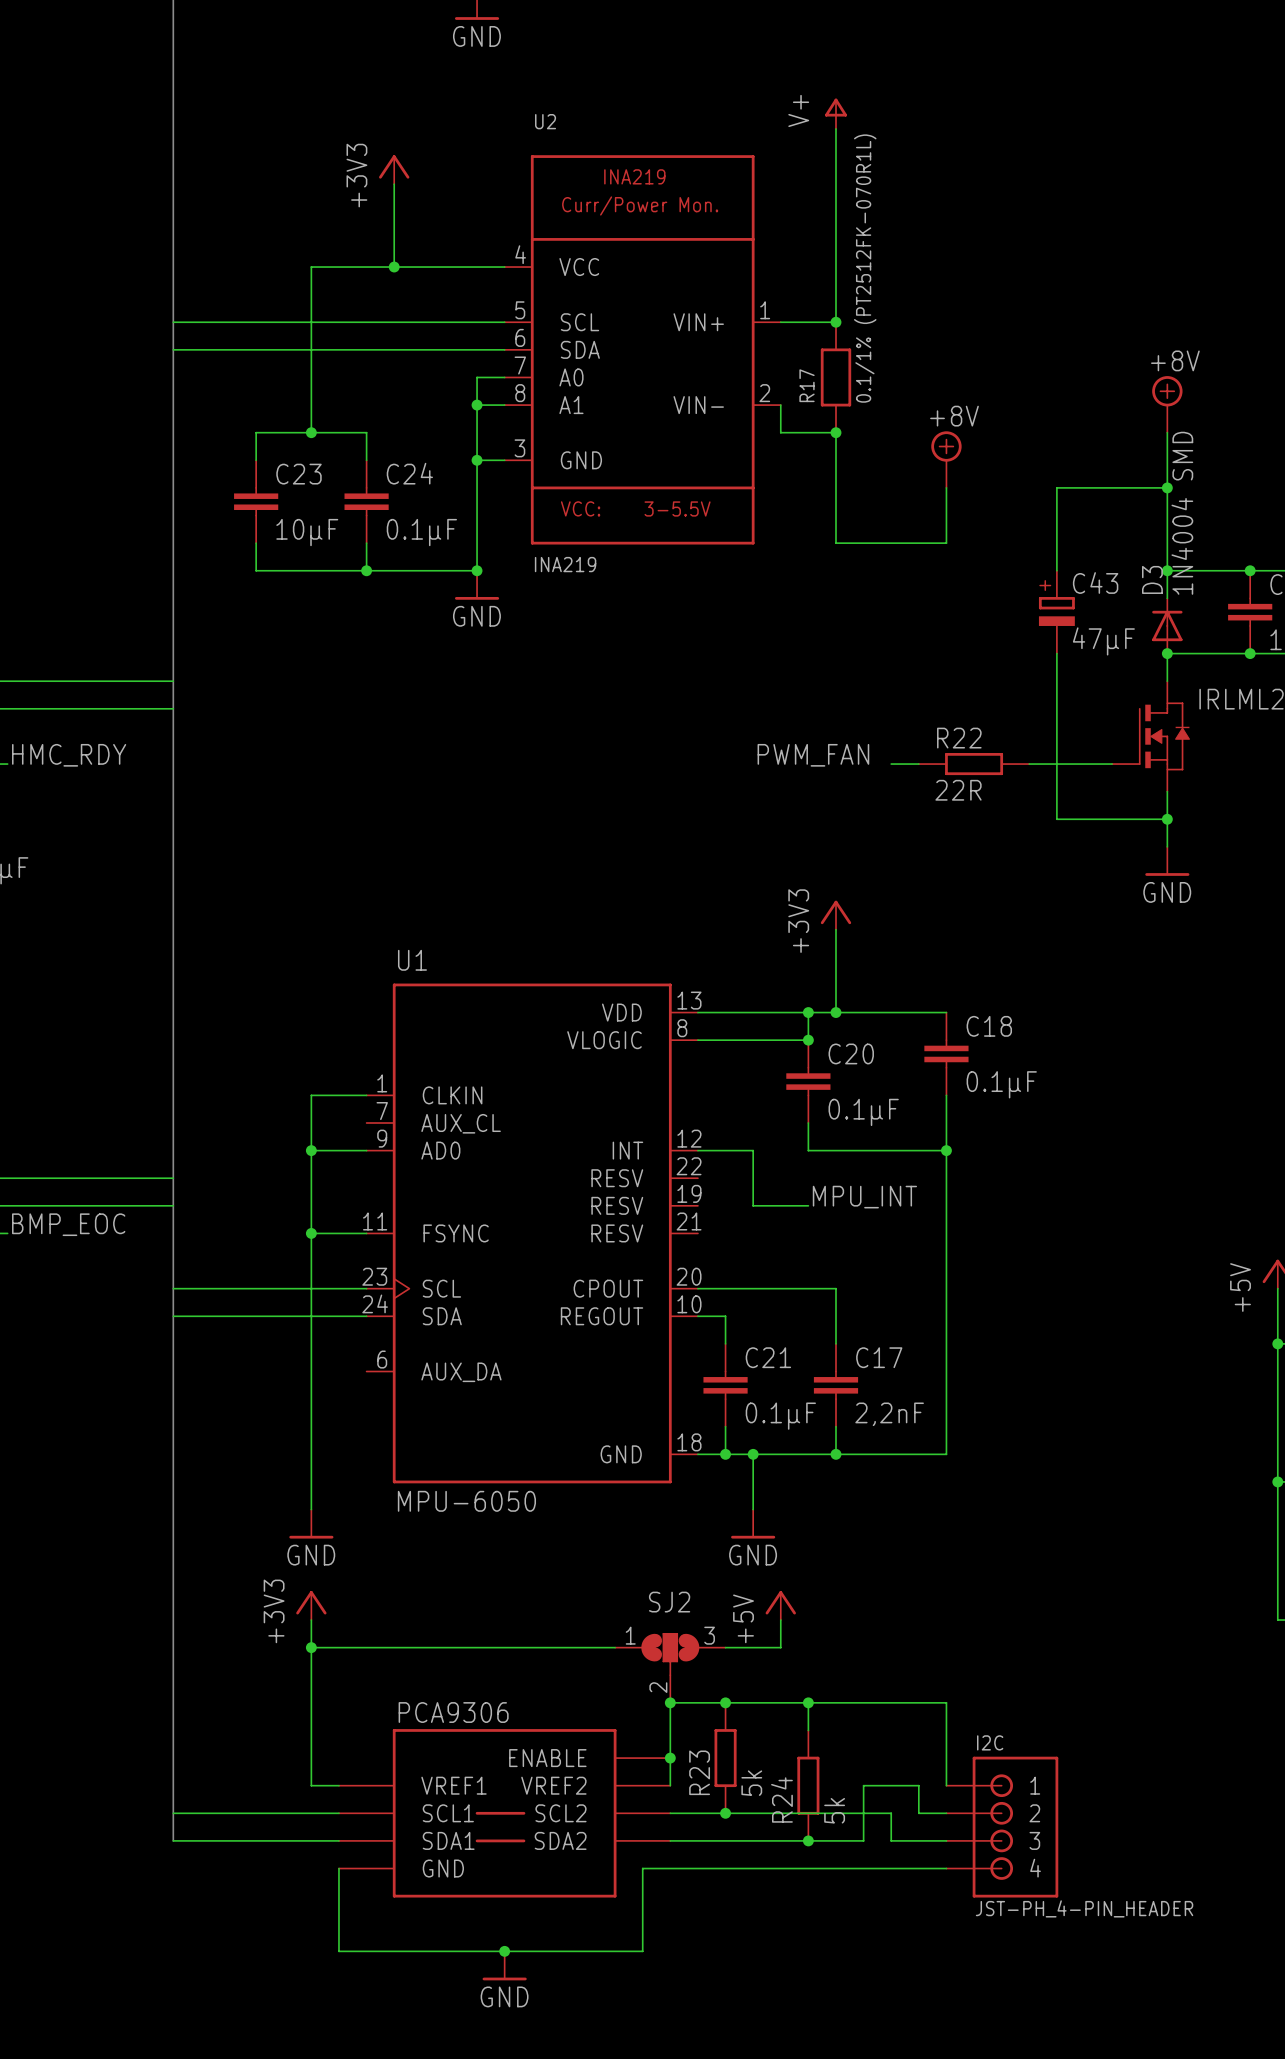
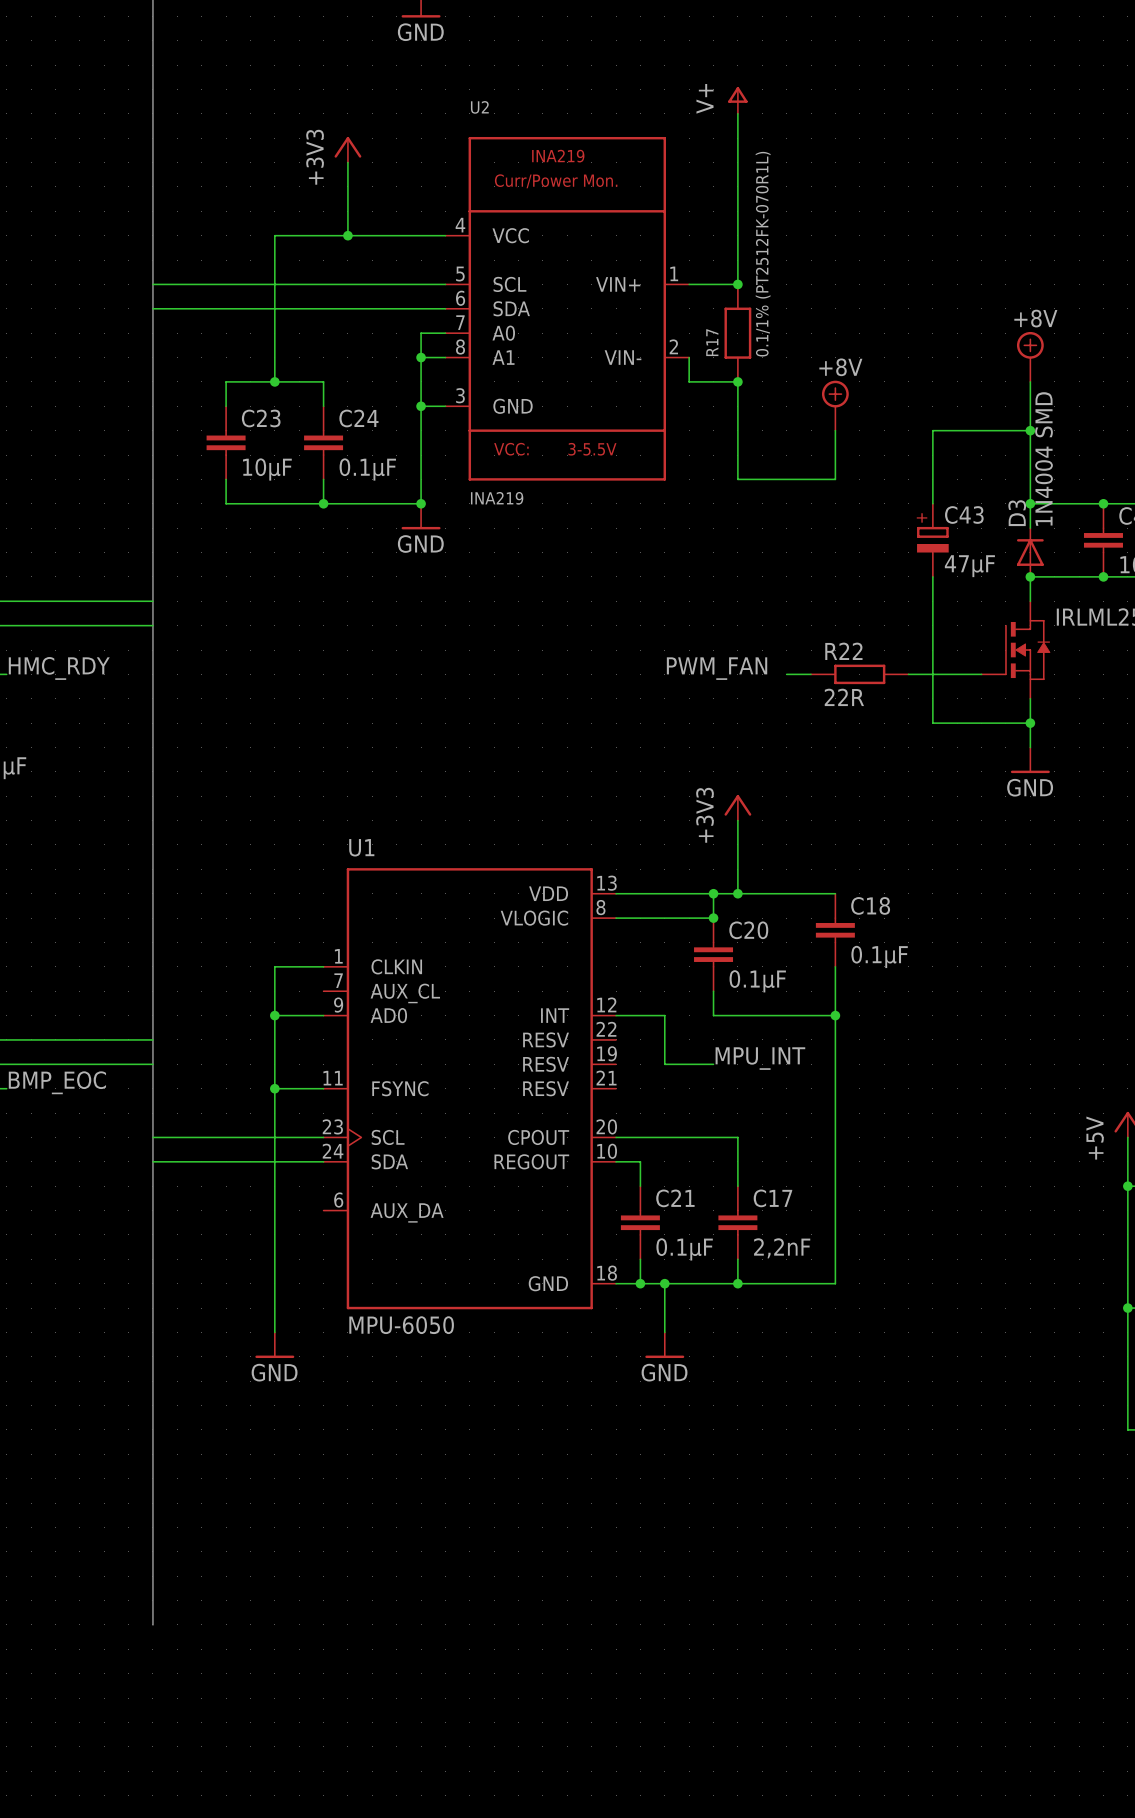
power symbol: +3V3 (311, 1605) -> none
power symbol: +5V (780, 1605) -> none
wire: (311, 1620) (311, 1785) (338, 1785) -> none
wire: (780, 1620) (780, 1647) (725, 1647) -> none
wire: (311, 1647) (615, 1647) -> none
junction: (311, 1647) -> none
SJ2: (670, 1667) -> none
junction: (670, 1702) -> none
junction: (725, 1702) -> none
wire: (808, 1702) (808, 1730) -> none
junction: (808, 1702) -> none
junction: (670, 1758) -> none
R23: 5k (725, 1758) -> none
wire: (670, 1785) (670, 1702) (946, 1702) (946, 1785) -> none
R24: 5k (808, 1785) -> none
wire: (173, 1813) (338, 1813) -> none
PCA9306: (504, 1813) -> none
wire: (670, 1813) (891, 1813) (891, 1840) (946, 1840) -> none
junction: (725, 1813) -> none
wire: (946, 1813) (918, 1813) (918, 1785) (863, 1785) (863, 1840) (670, 1840) -> none
I2C: JST-PH_4-PIN_HEADER (1002, 1827) -> none
wire: (173, 1840) (338, 1840) -> none
junction: (808, 1840) -> none
wire: (338, 1868) (338, 1951) (642, 1951) (642, 1868) (946, 1868) -> none
junction: (504, 1951) -> none
power symbol: GND (504, 1965) -> none

